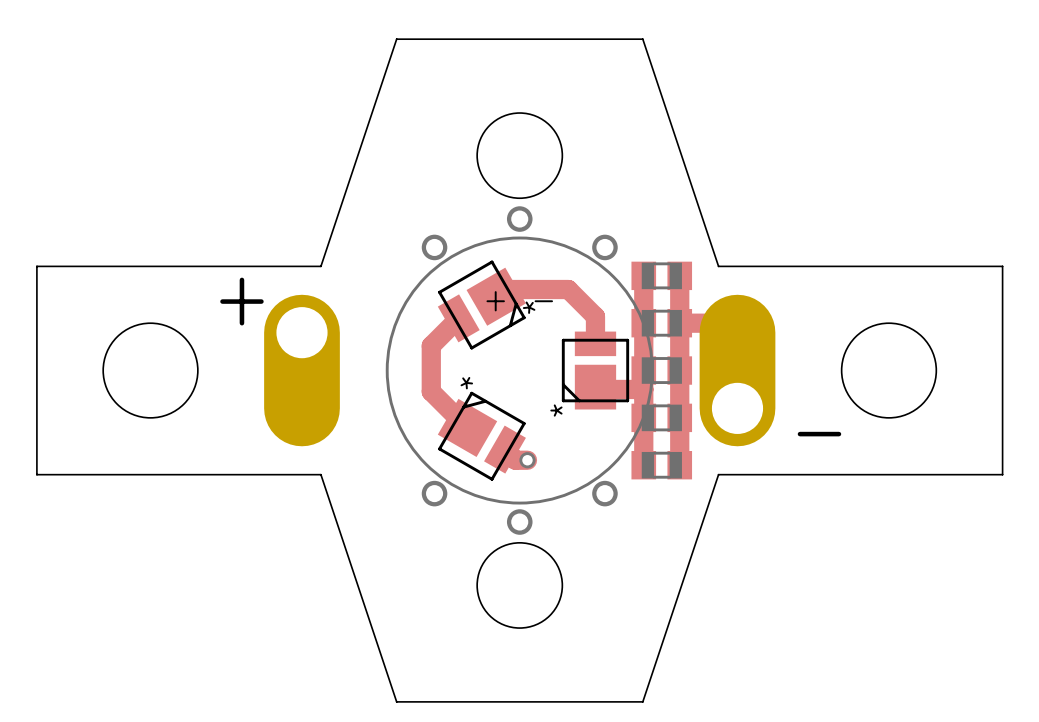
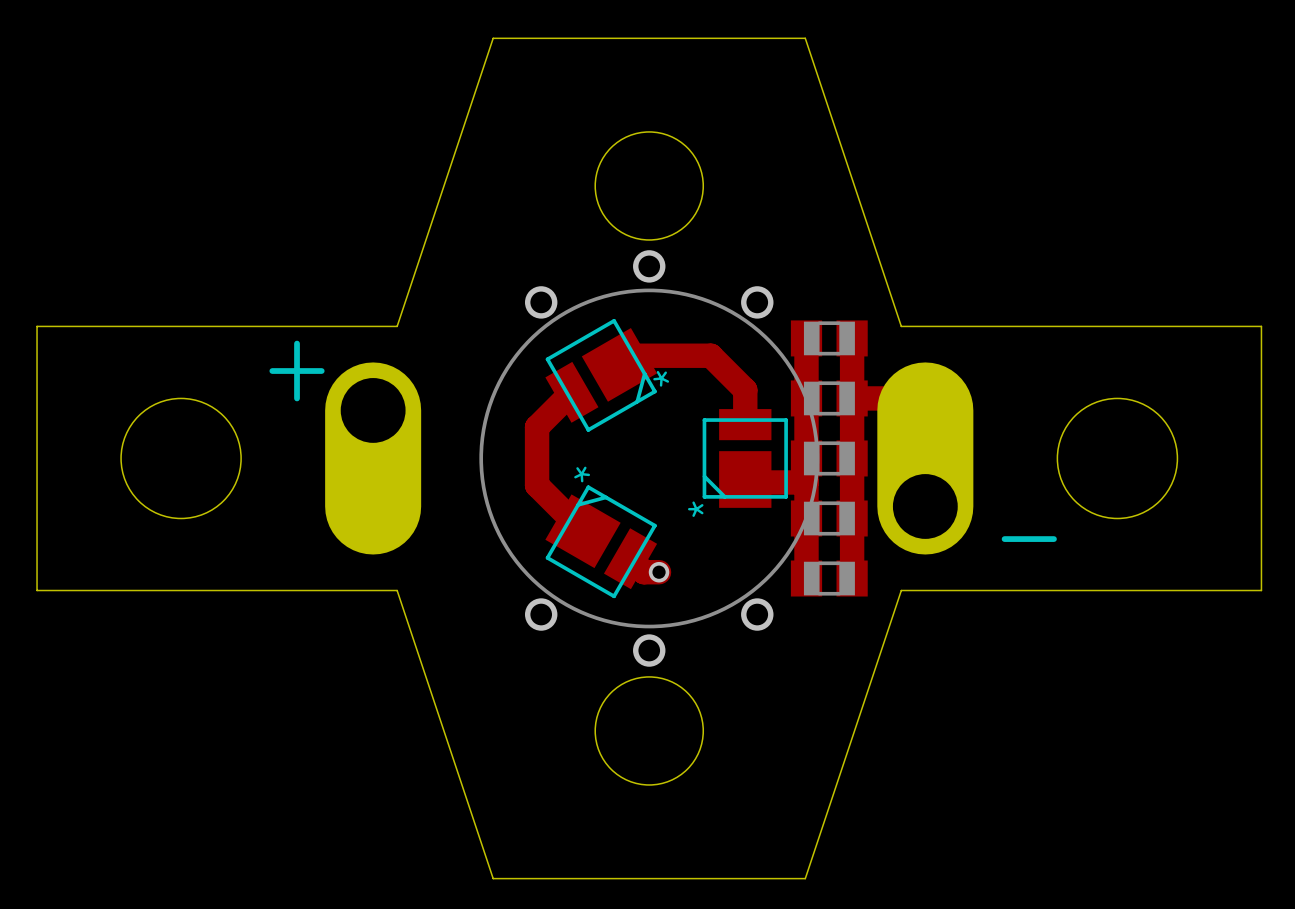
part: (519, 301) -> none

